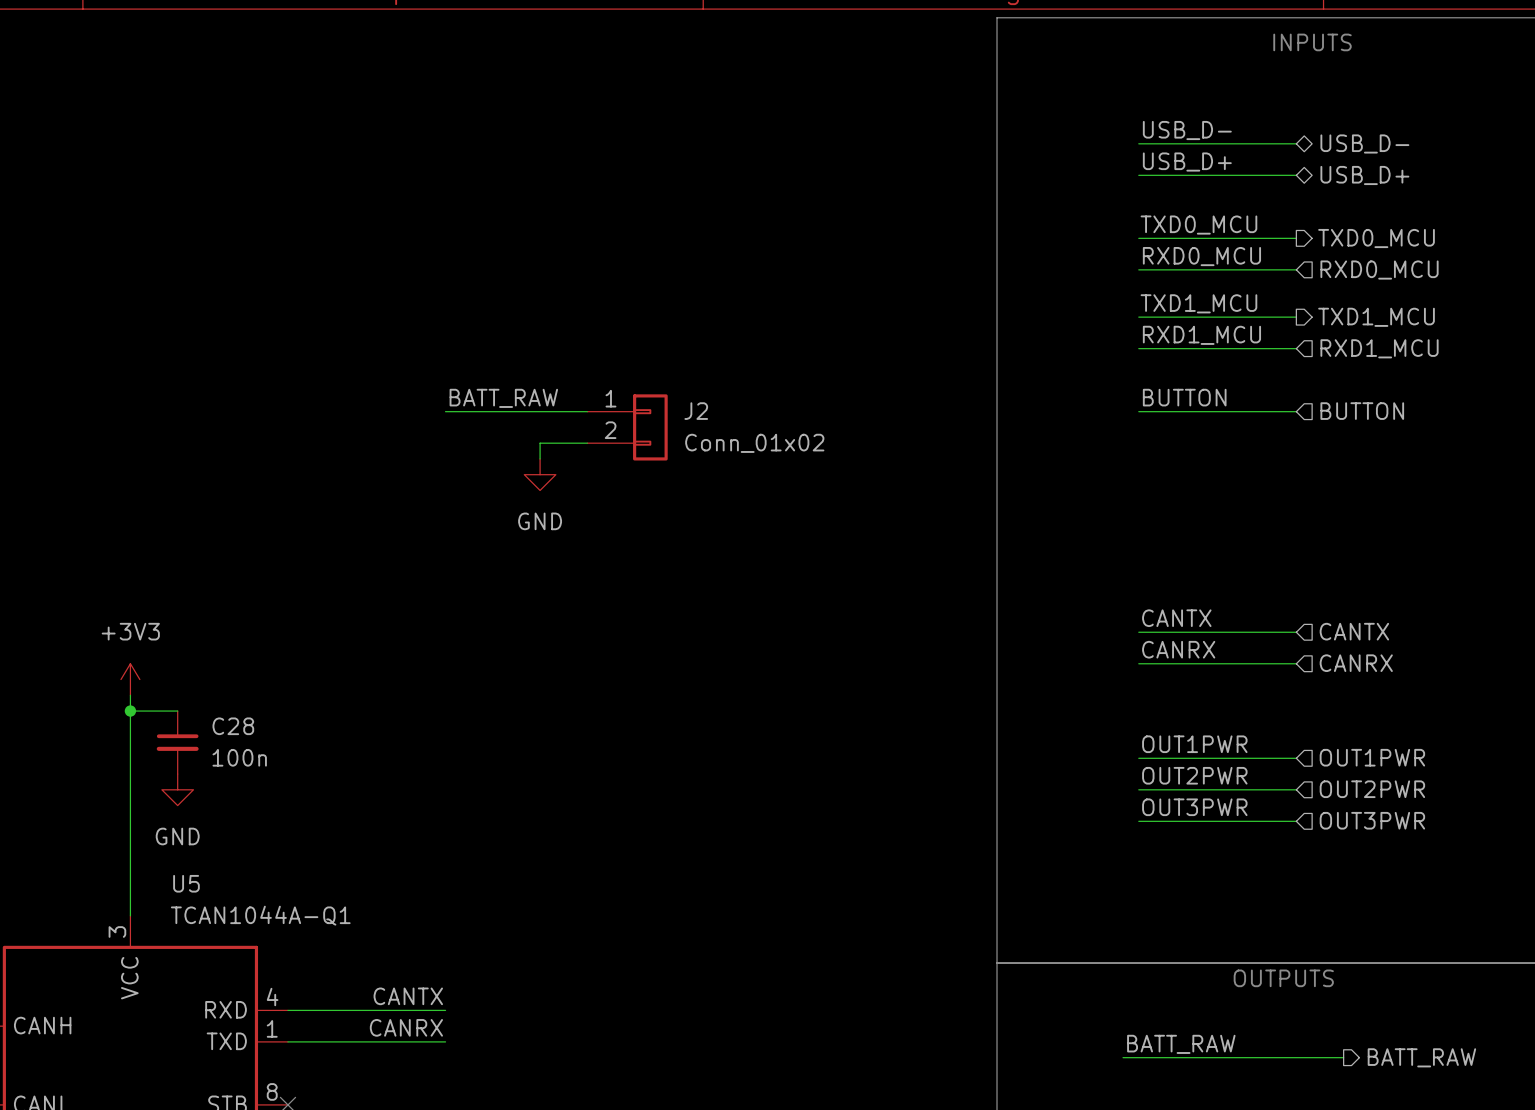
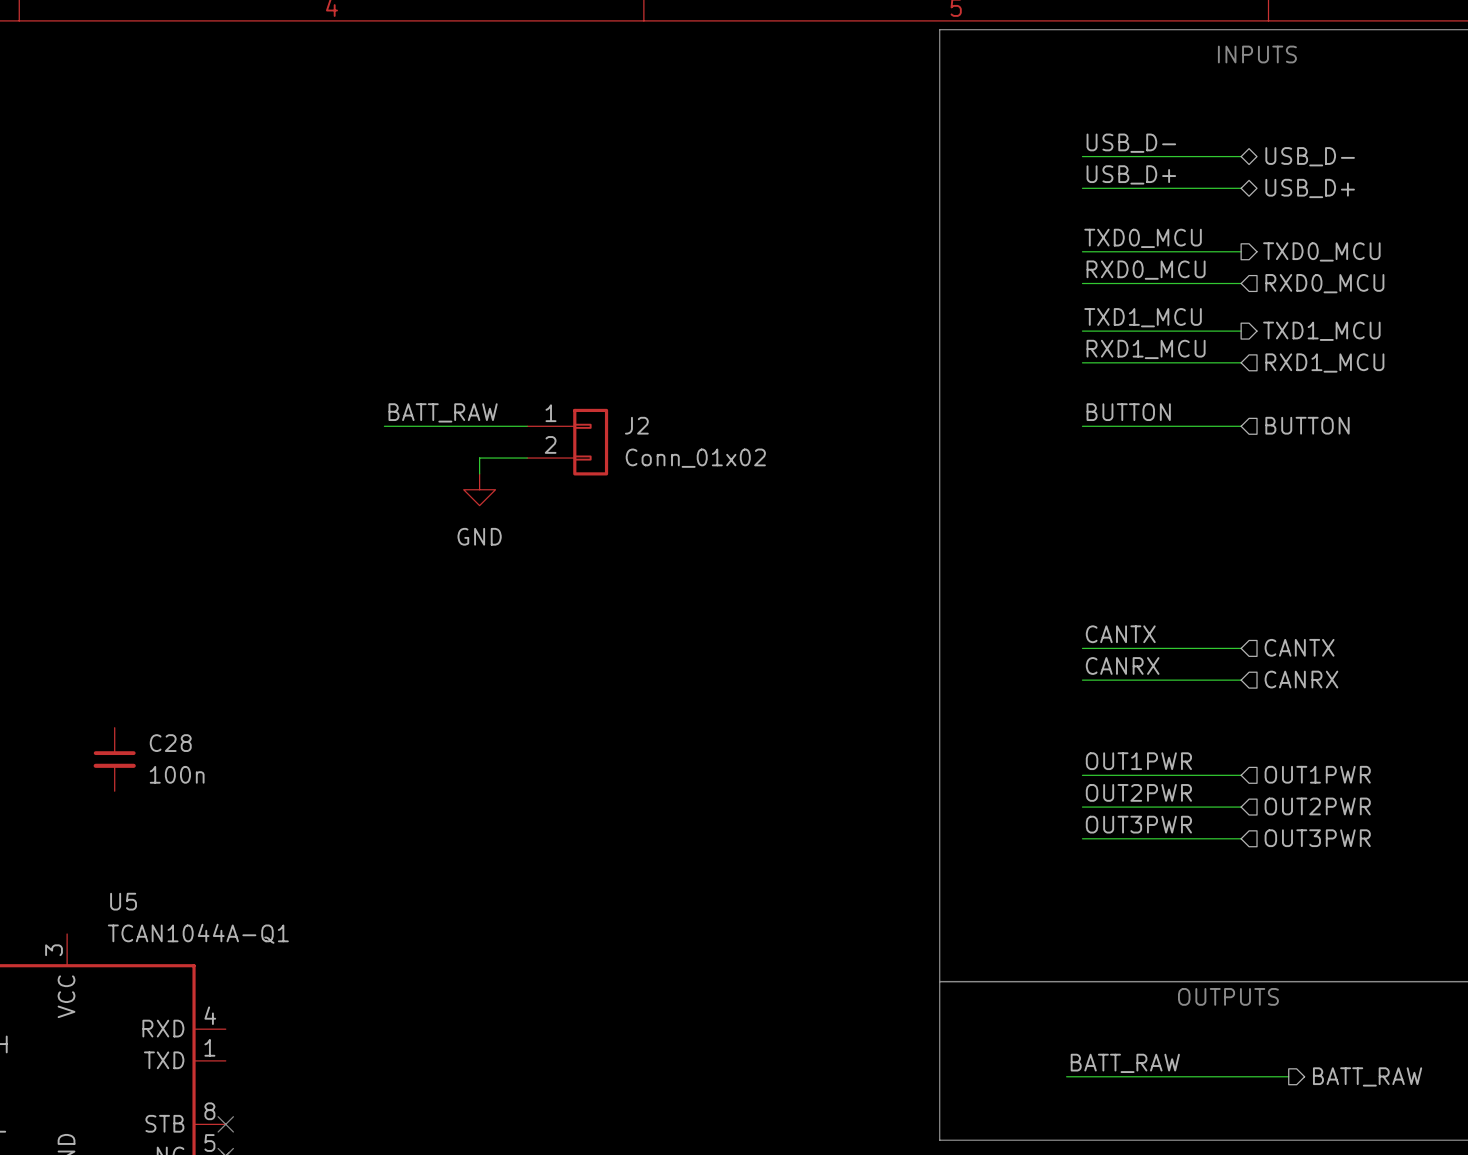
power symbol: +3V3 (130, 679) -> none
wire: (130, 695) (130, 915) -> none
wire: (130, 711) (177, 711) -> none
junction: (130, 711) -> none
power symbol: GND (177, 789) -> none
label: CANTX (408, 996) -> none
wire: (287, 1010) (445, 1010) -> none
label: CANRX (406, 1027) -> none
wire: (287, 1041) (445, 1041) -> none

